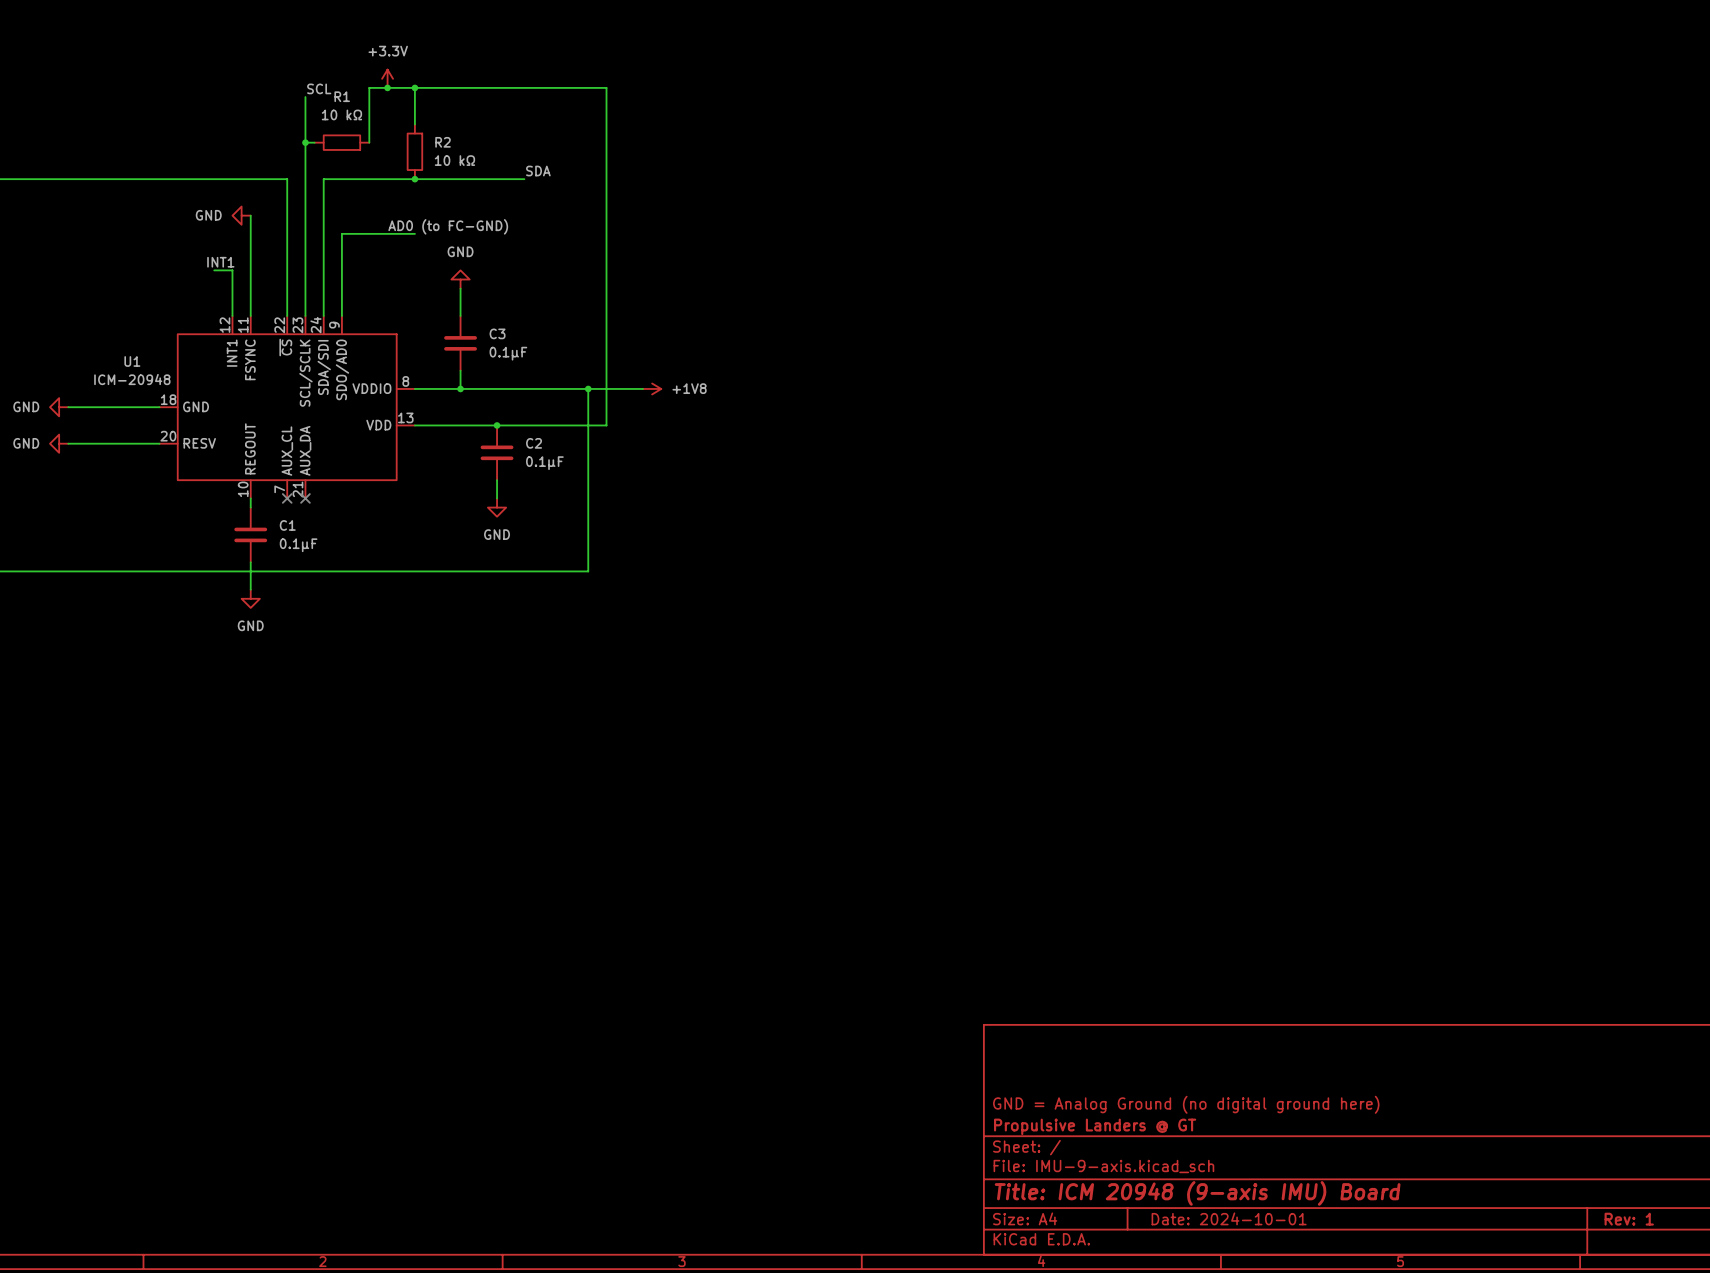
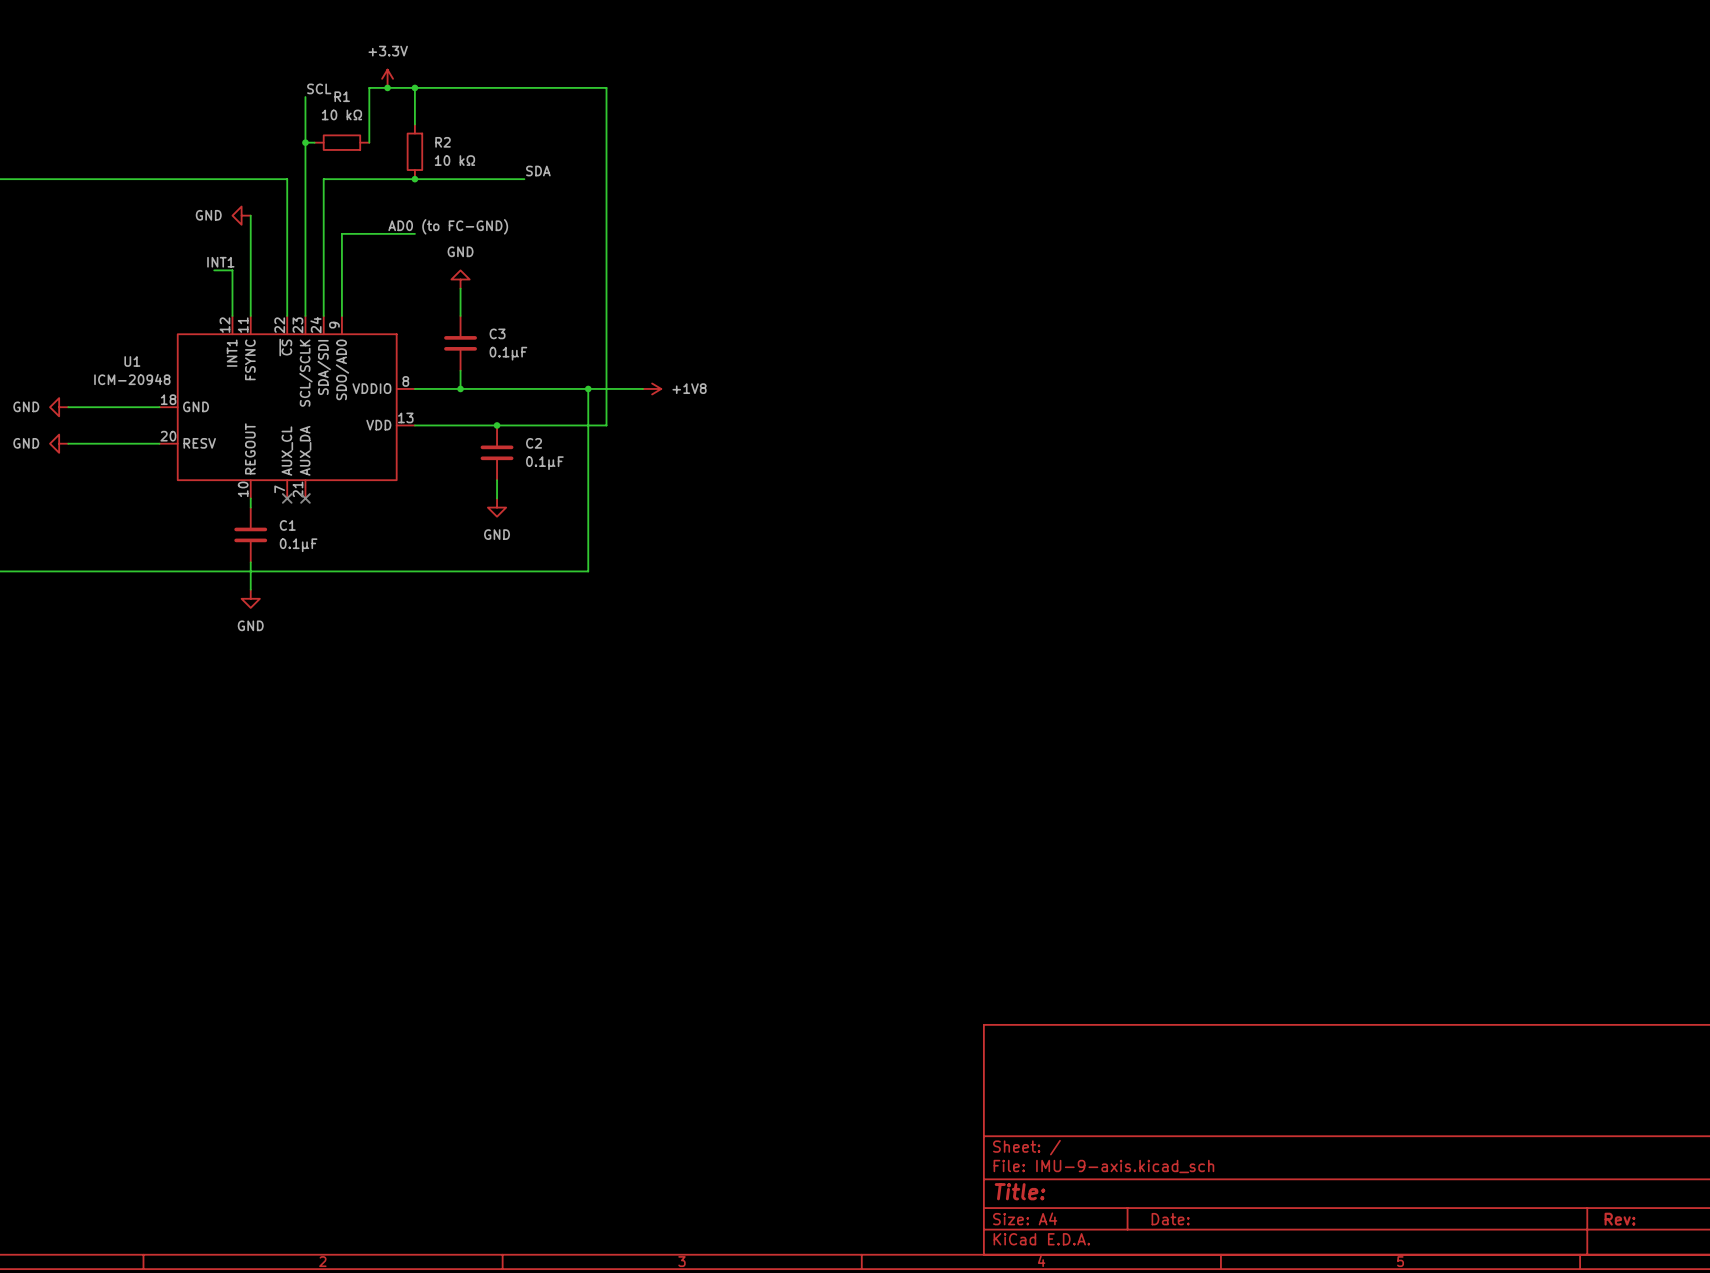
title block: GND = Analog Ground (no digital ground here) (1186, 1104) -> none
title block: Propulsive Landers @ GT (1095, 1126) -> none
title block: Title: ICM 20948 (9-axis IMU) Board (1197, 1193) -> Title: (1020, 1191)
title block: Date: 2024-10-01 (1229, 1218) -> Date: (1170, 1219)
title block: Rev: 1 (1629, 1219) -> Rev: (1619, 1219)

